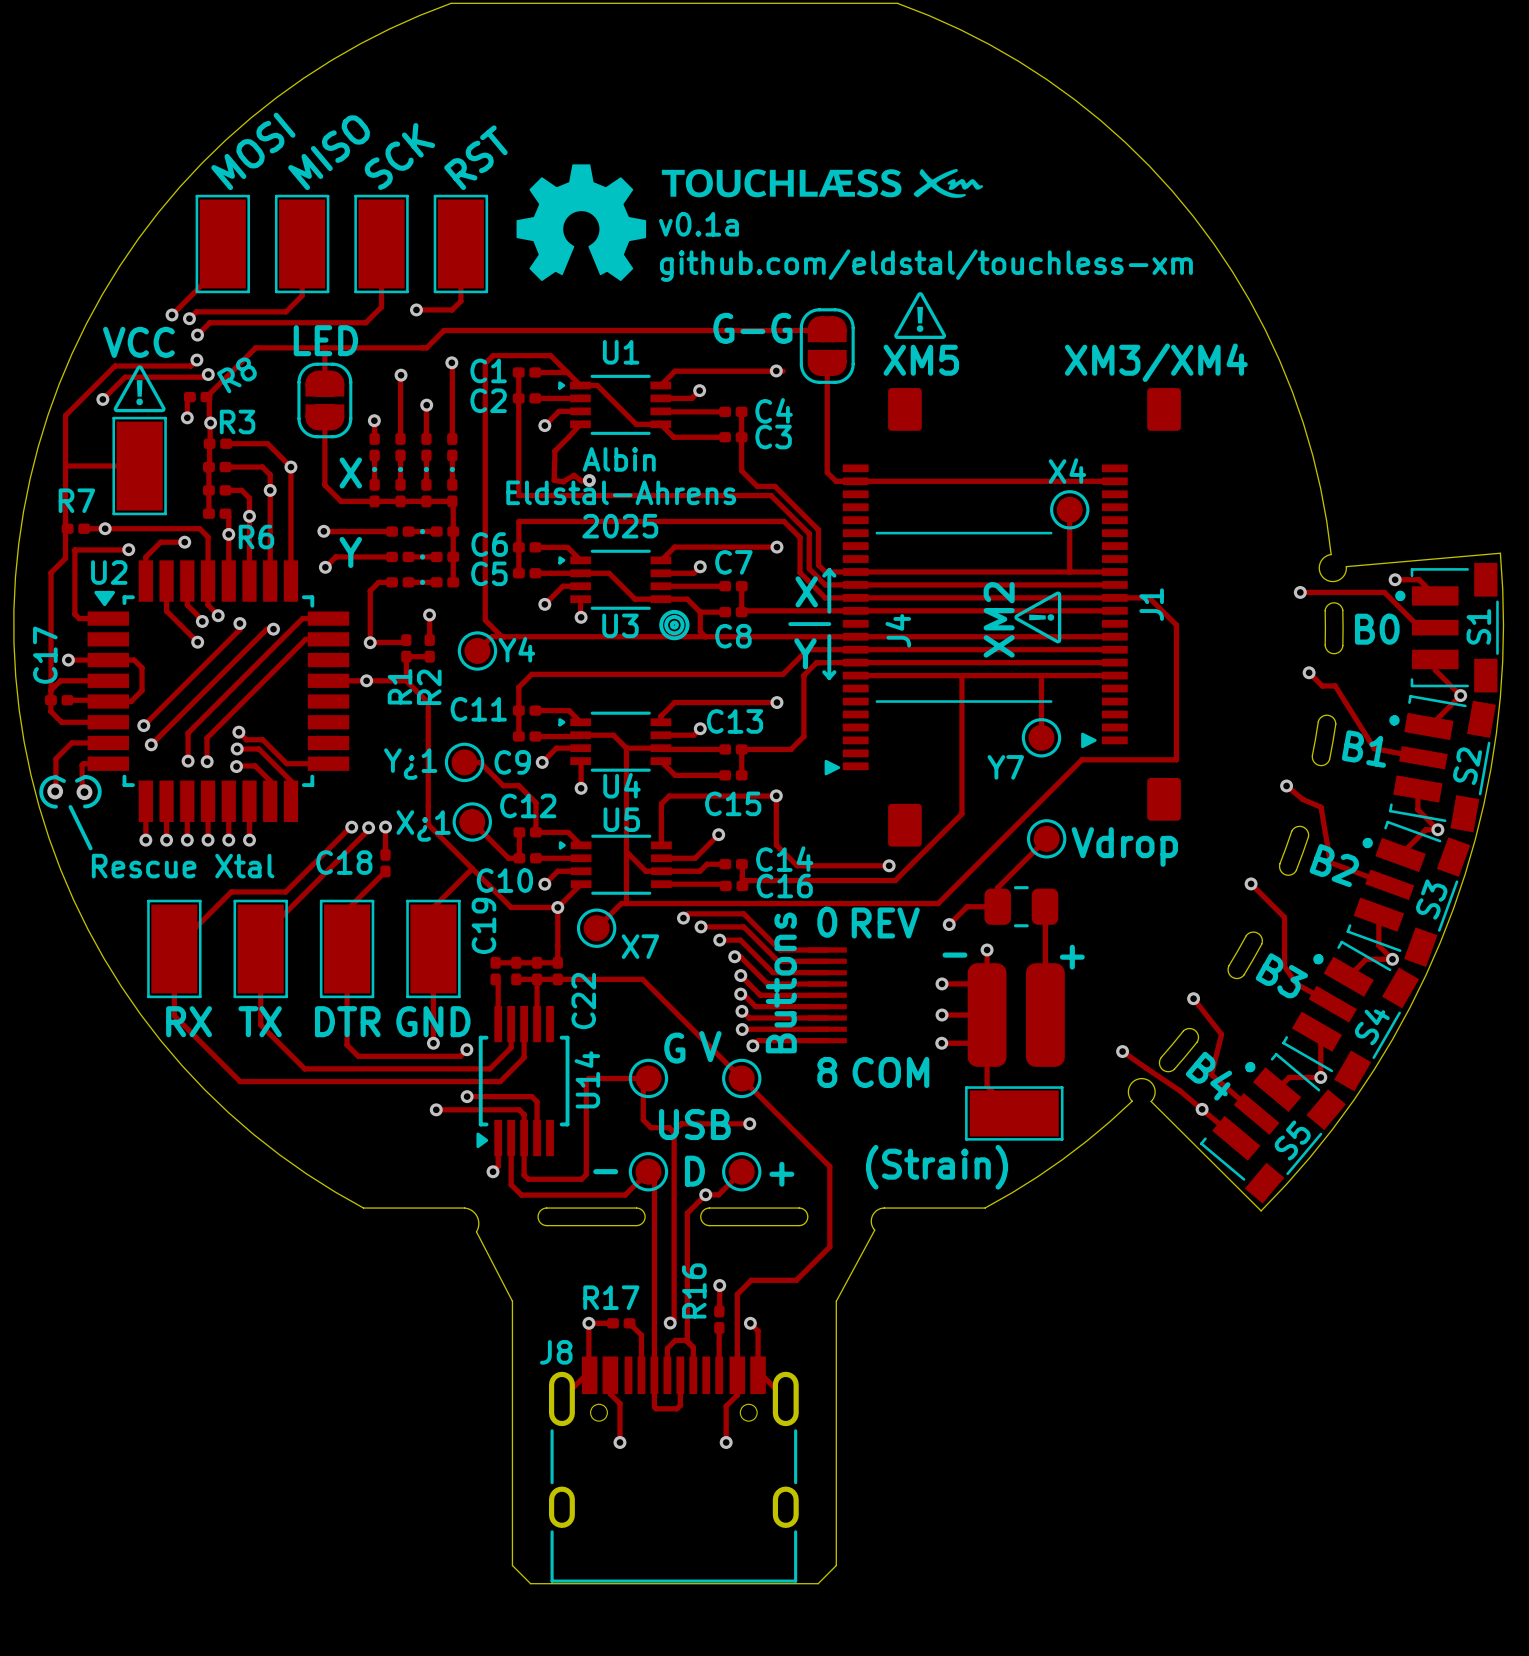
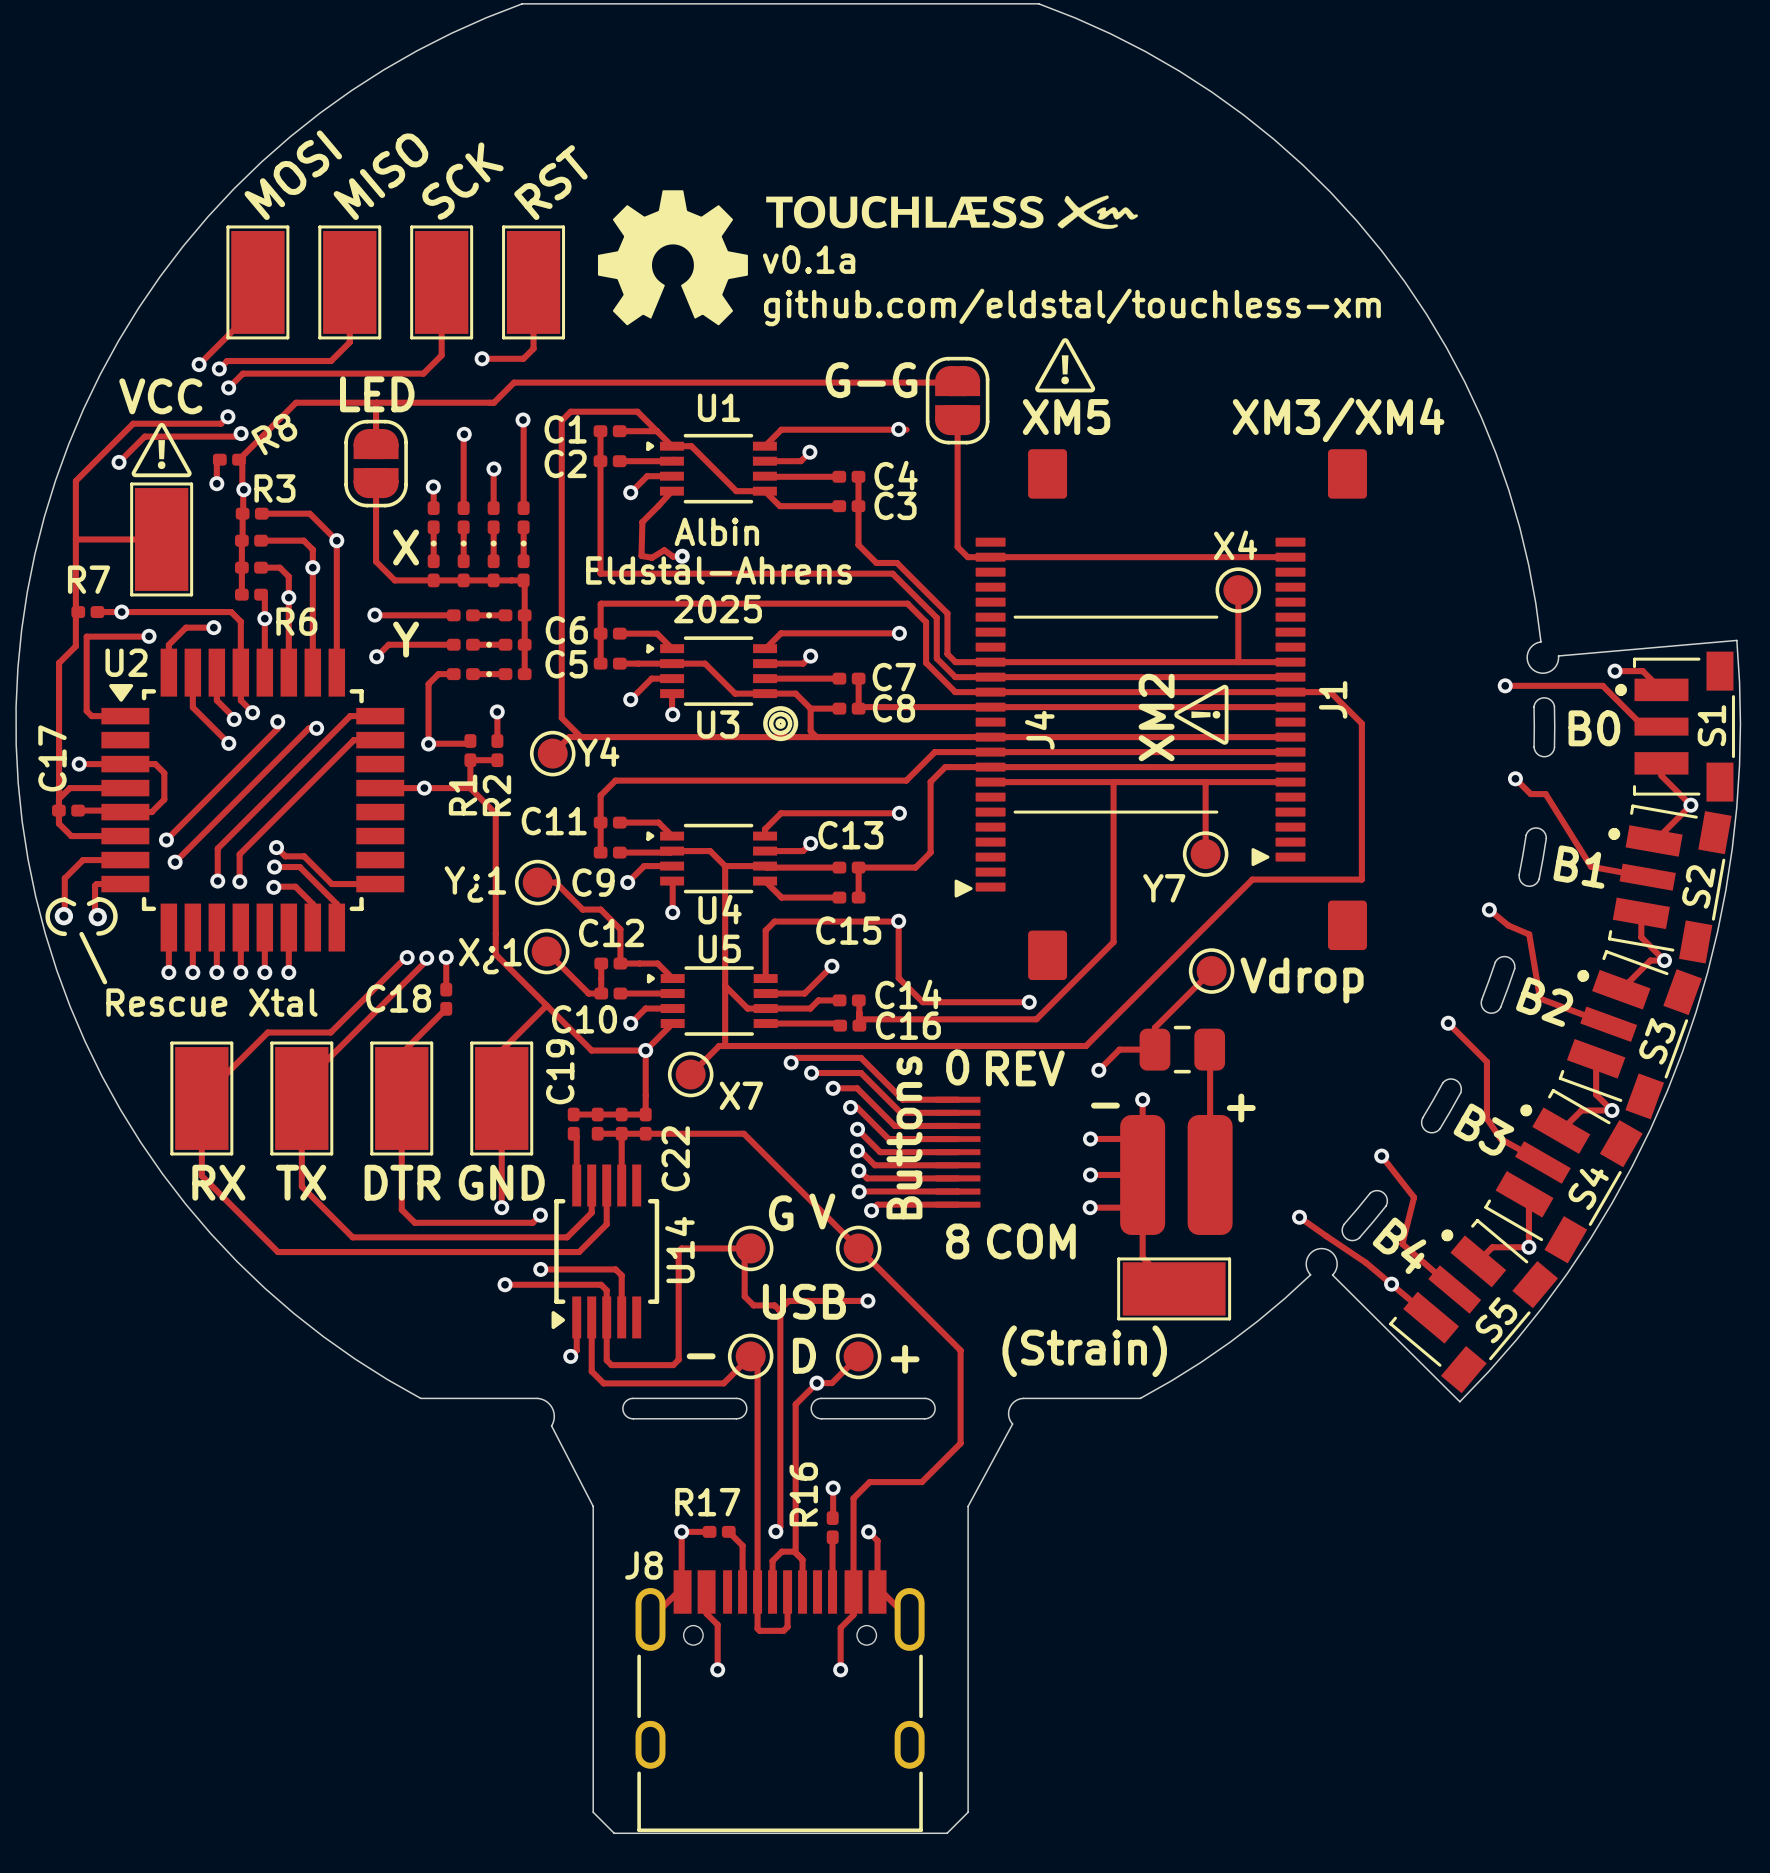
C7 name position: C7 (733, 562) -> C7 (894, 677)
line: (829, 570) (834, 575) -> none
line: (829, 570) (829, 611) -> none
line: (829, 570) (824, 575) -> none
text: X (806, 591) -> none
line: (790, 624) (829, 624) -> none
C8 name position: C8 (733, 636) -> C8 (894, 708)
line: (829, 636) (829, 677) -> none
text: Y (805, 653) -> none
line: (824, 672) (829, 677) -> none
line: (834, 672) (829, 677) -> none

